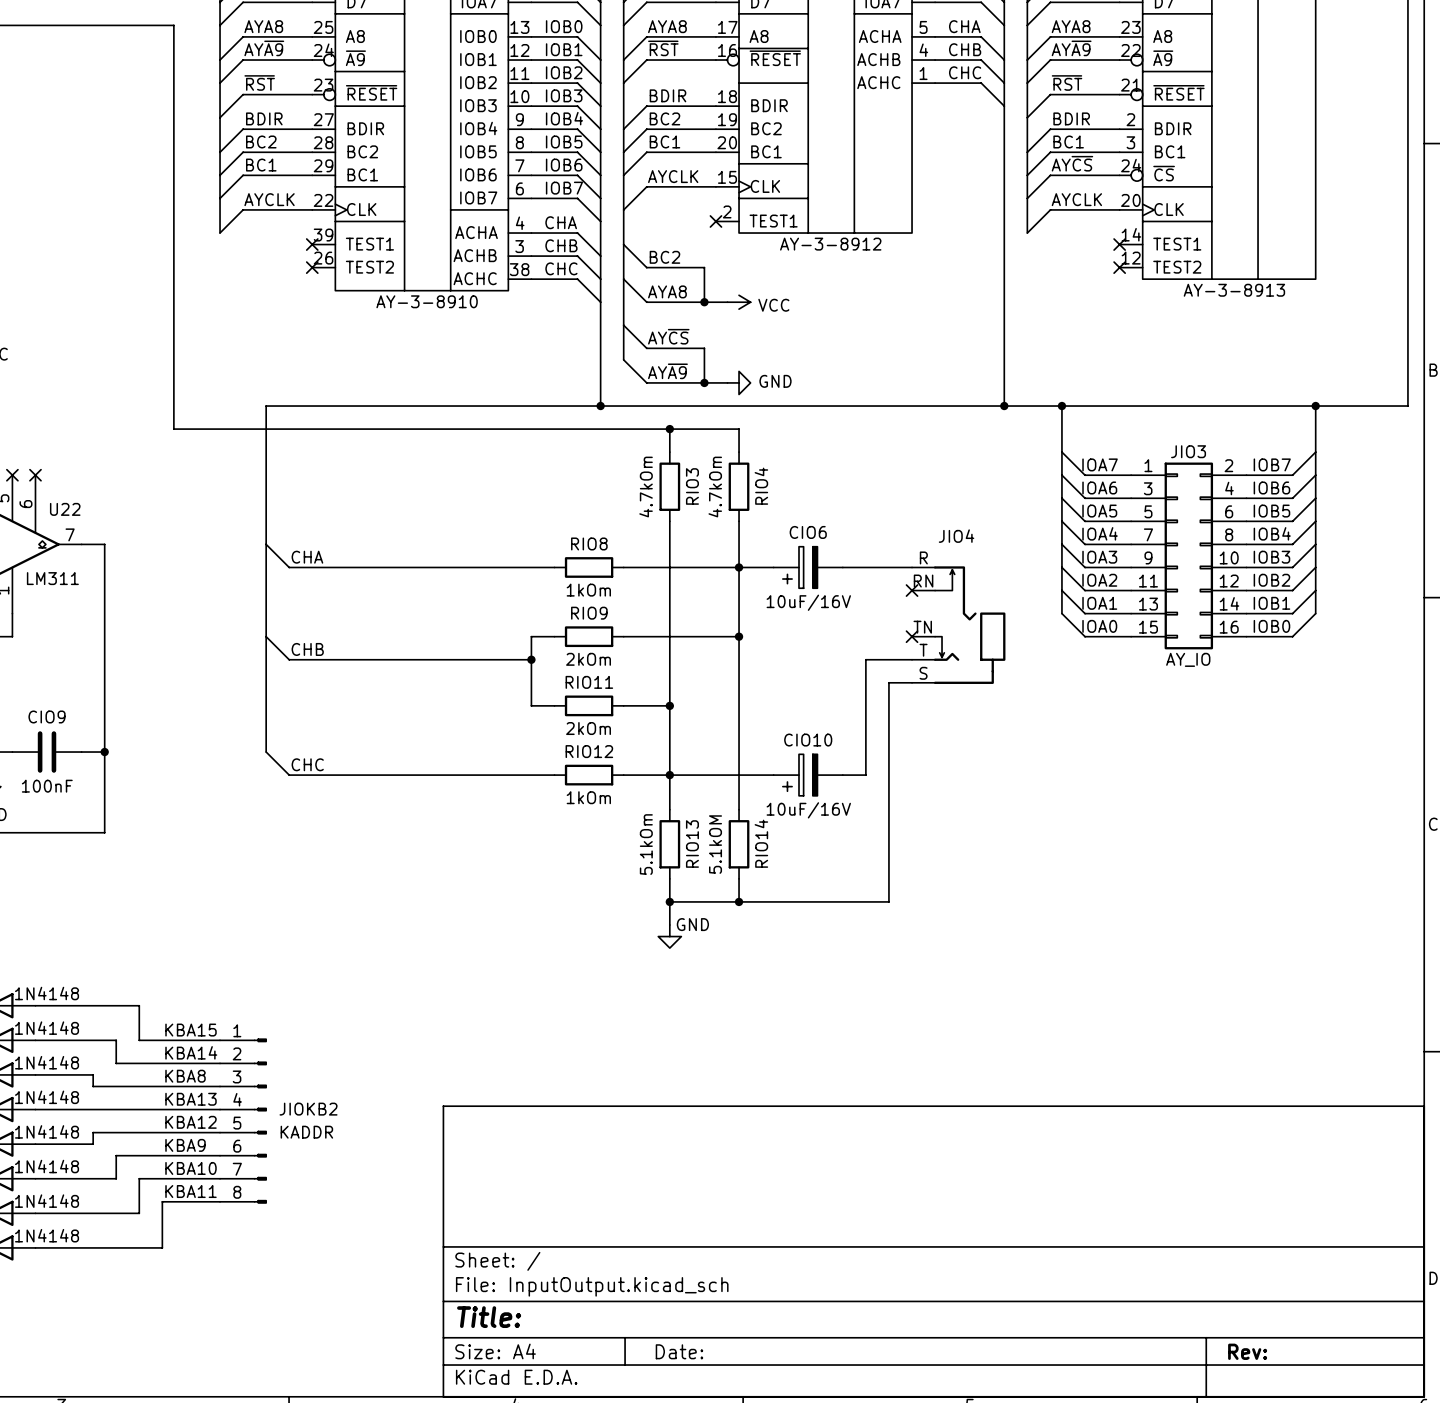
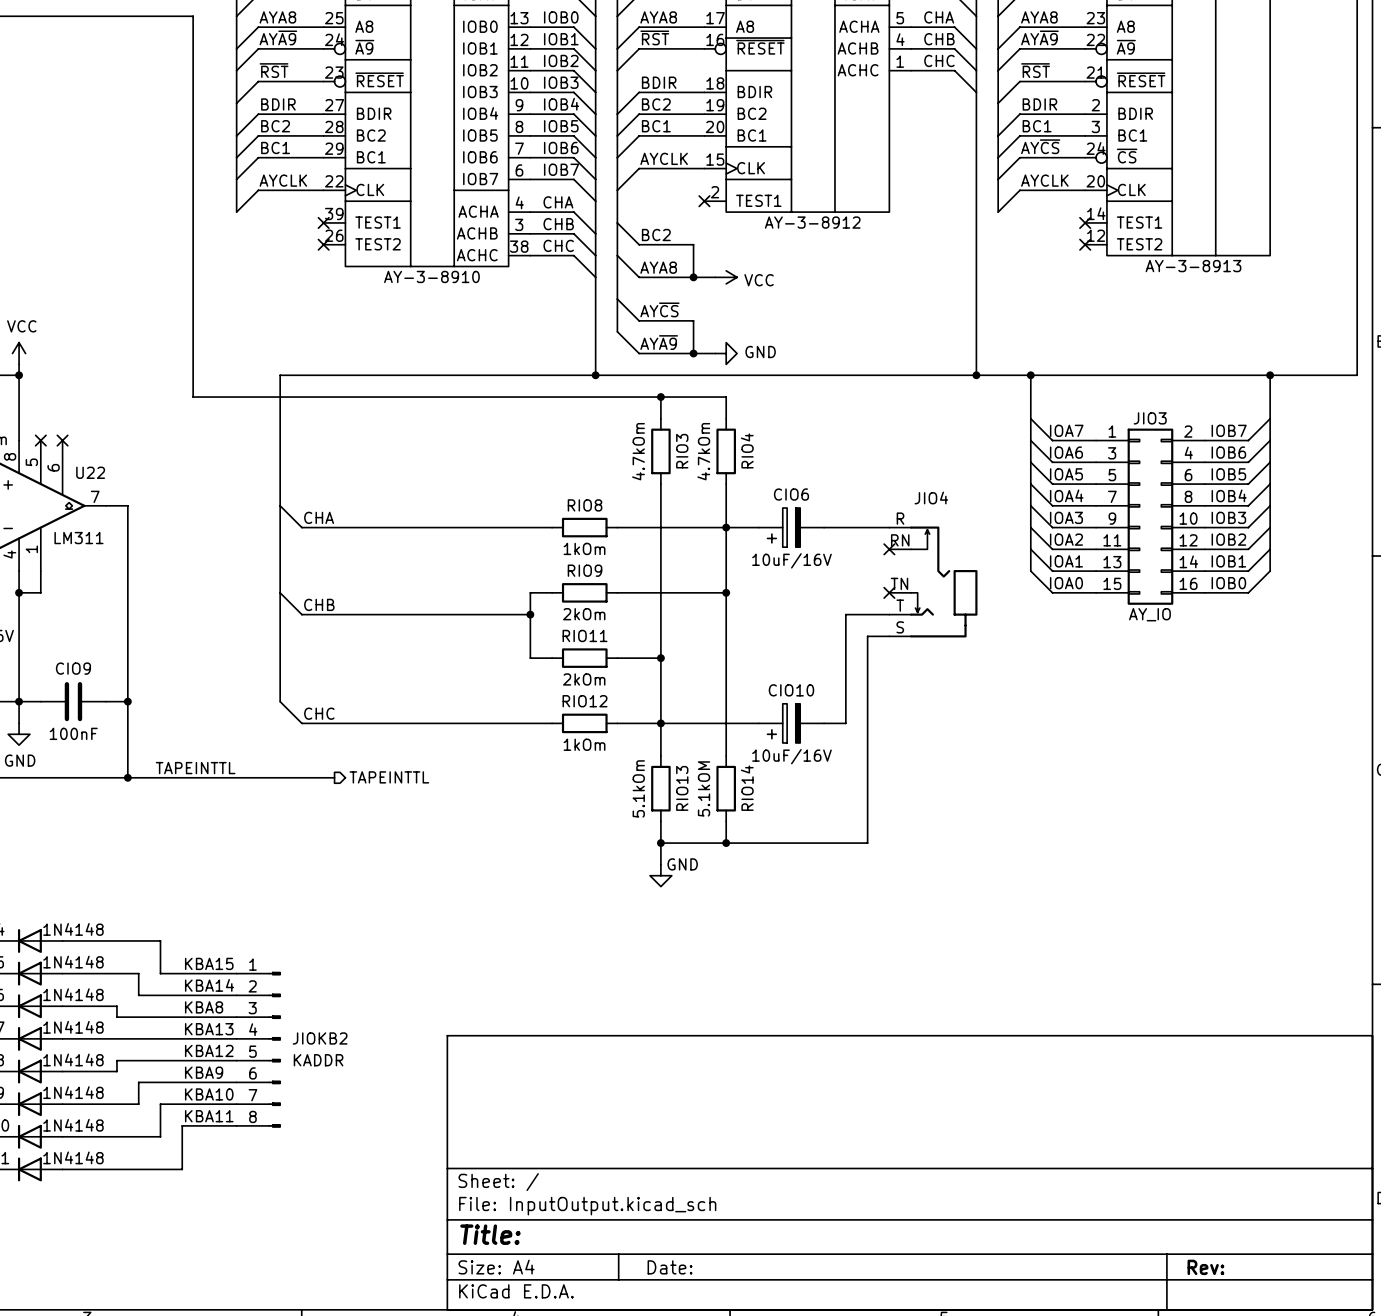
label: none -> TAPEINTTL (195, 768)
wire: none -> (127, 777) (334, 777)
junction: none -> (127, 777)
hierarchical label: none -> TAPEINTTL (389, 777)

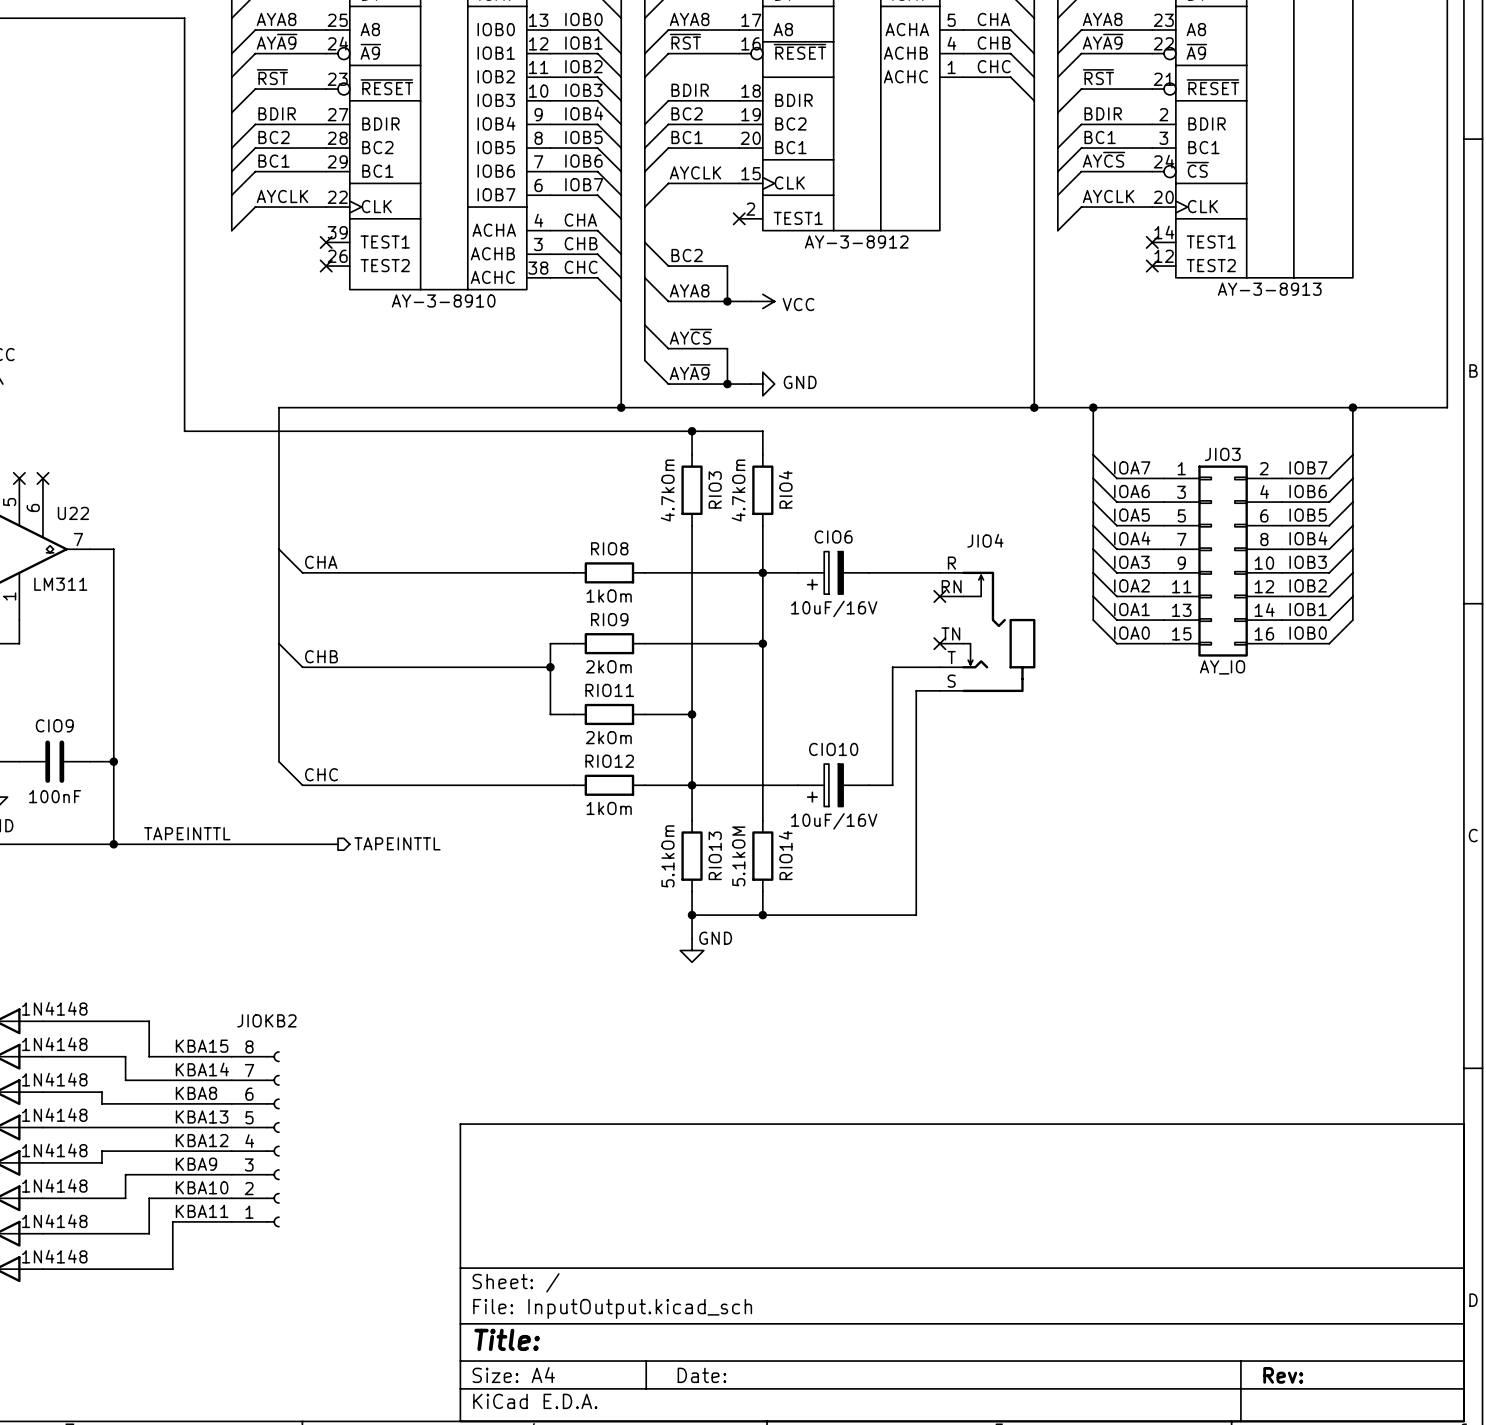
JIOKB2 symbol: [236, 971, 281, 1128] -> [231, 1051, 280, 1228]
JIOKB2 name position: JIOKB2 (320, 1038) -> JIOKB2 (266, 1020)
JIOKB2 value: KADDR (318, 1060) -> none

